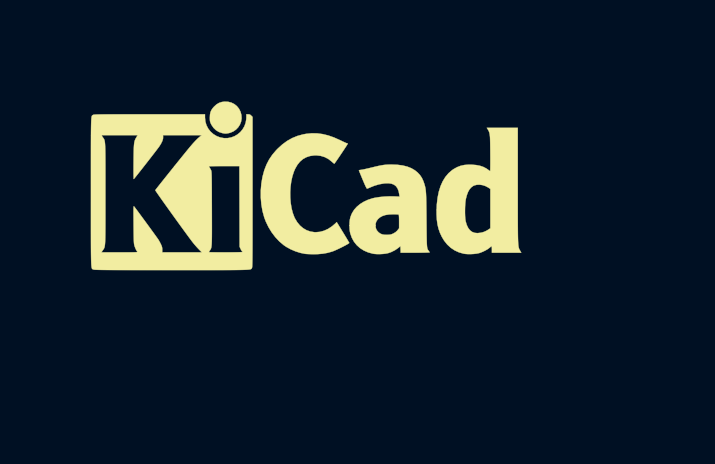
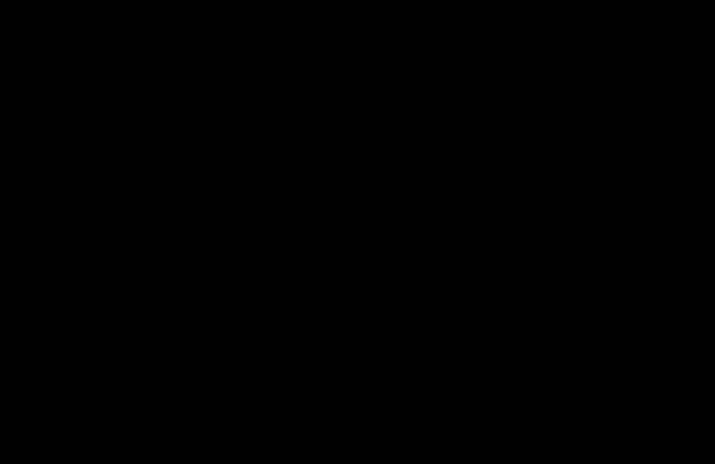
drawing: [90, 101, 522, 271] -> none

